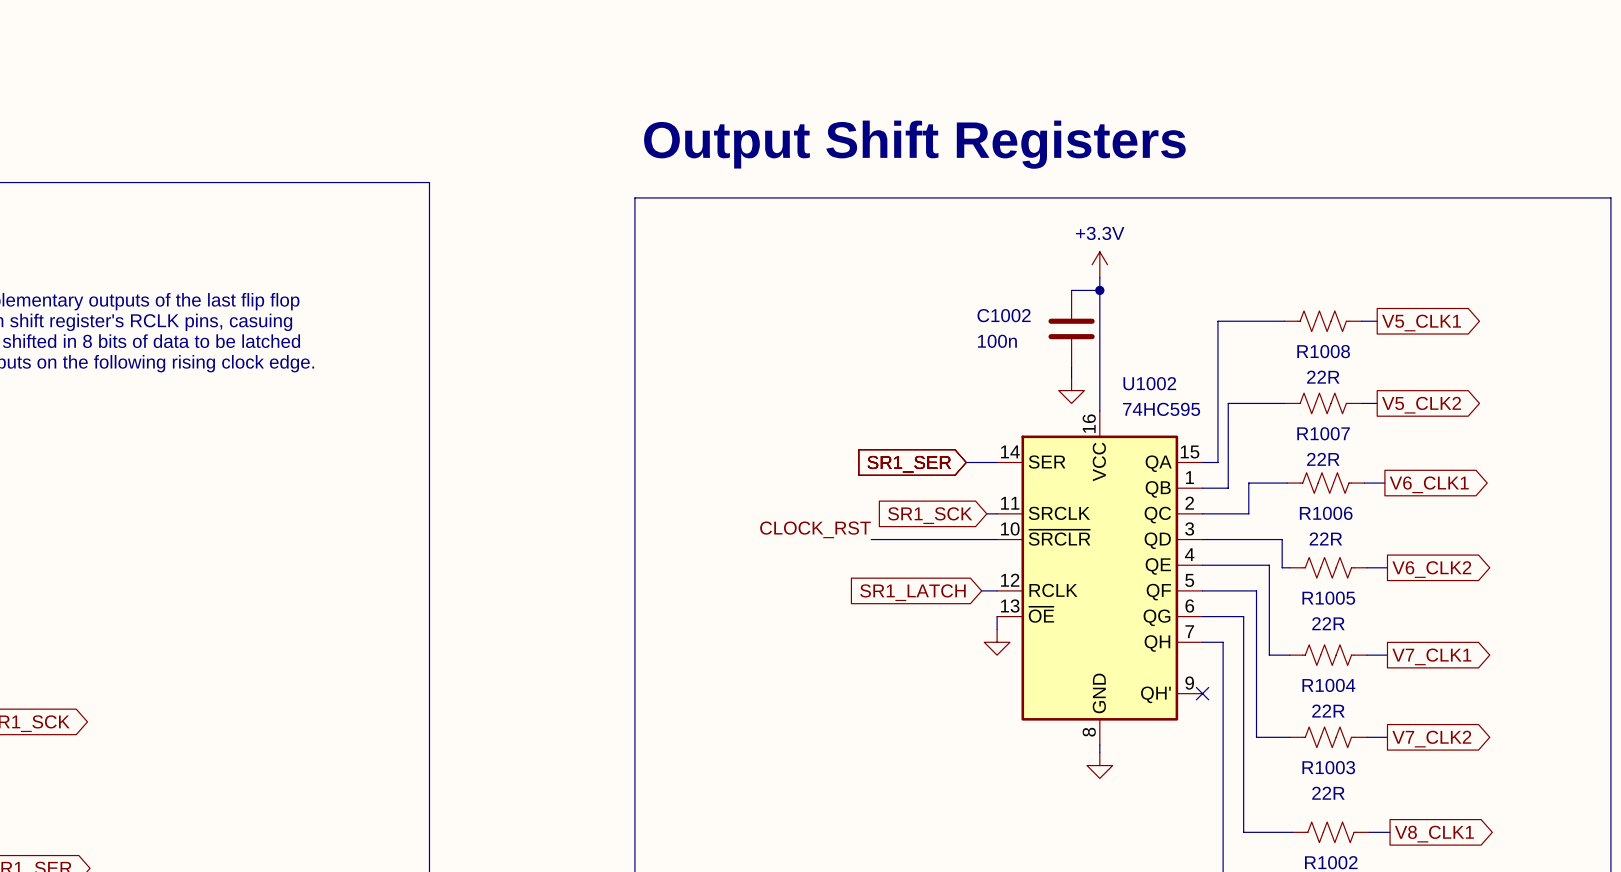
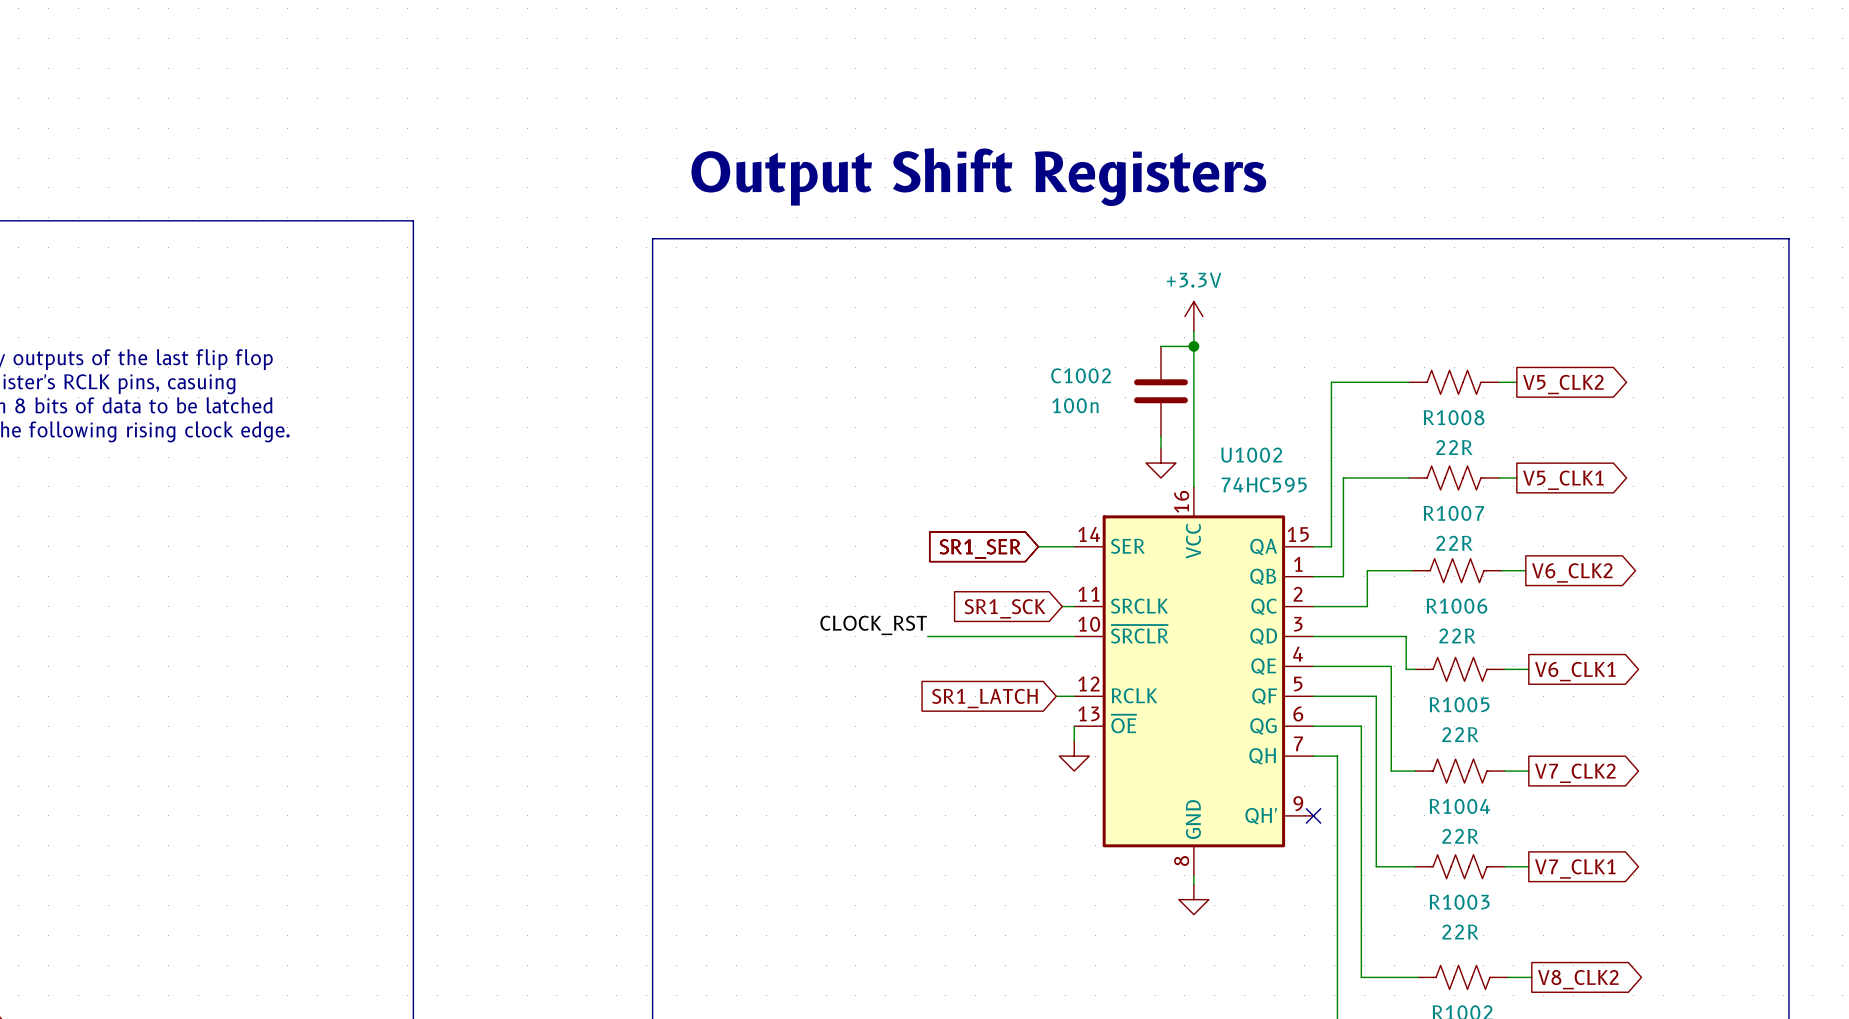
global label: V5_CLK1 (1421, 323) -> V5_CLK2 (1563, 384)
global label: V5_CLK2 (1421, 405) -> V5_CLK1 (1563, 480)
global label: V6_CLK1 (1429, 484) -> V6_CLK2 (1572, 572)
global label: V6_CLK2 (1431, 569) -> V6_CLK1 (1575, 671)
global label: V7_CLK1 (1431, 656) -> V7_CLK2 (1575, 773)
global label: V7_CLK2 (1431, 739) -> V7_CLK1 (1575, 868)
global label: V8_CLK1 (1434, 834) -> V8_CLK2 (1578, 979)

